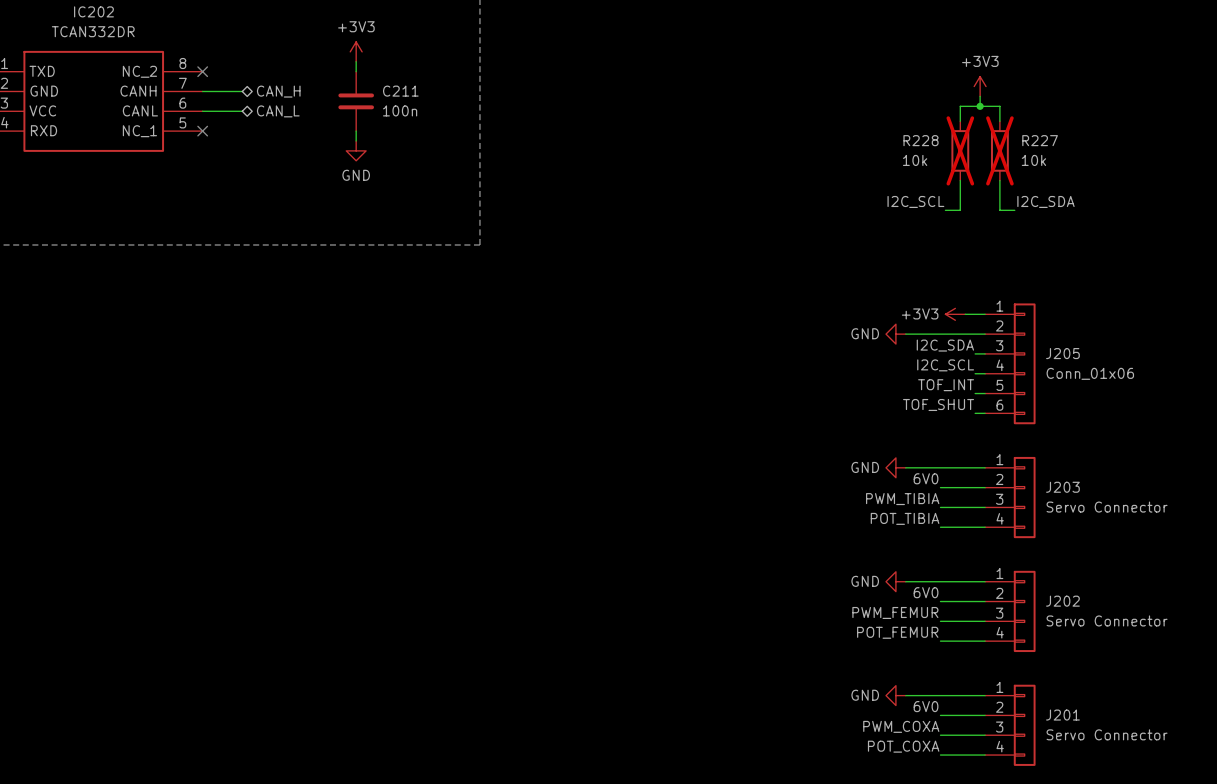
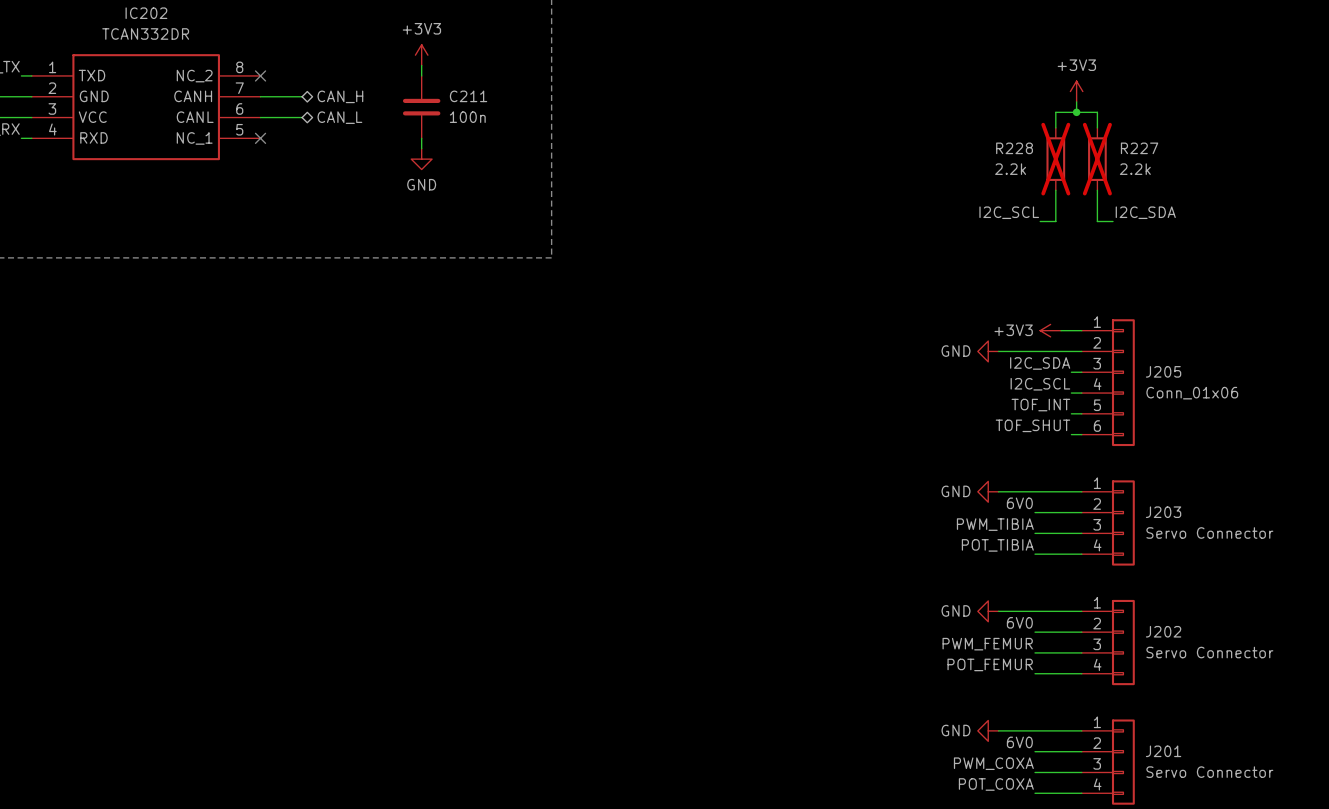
R228 value: 10k (915, 160) -> 2.2k (1010, 169)
R227 value: 10k (1033, 160) -> 2.2k (1135, 169)

